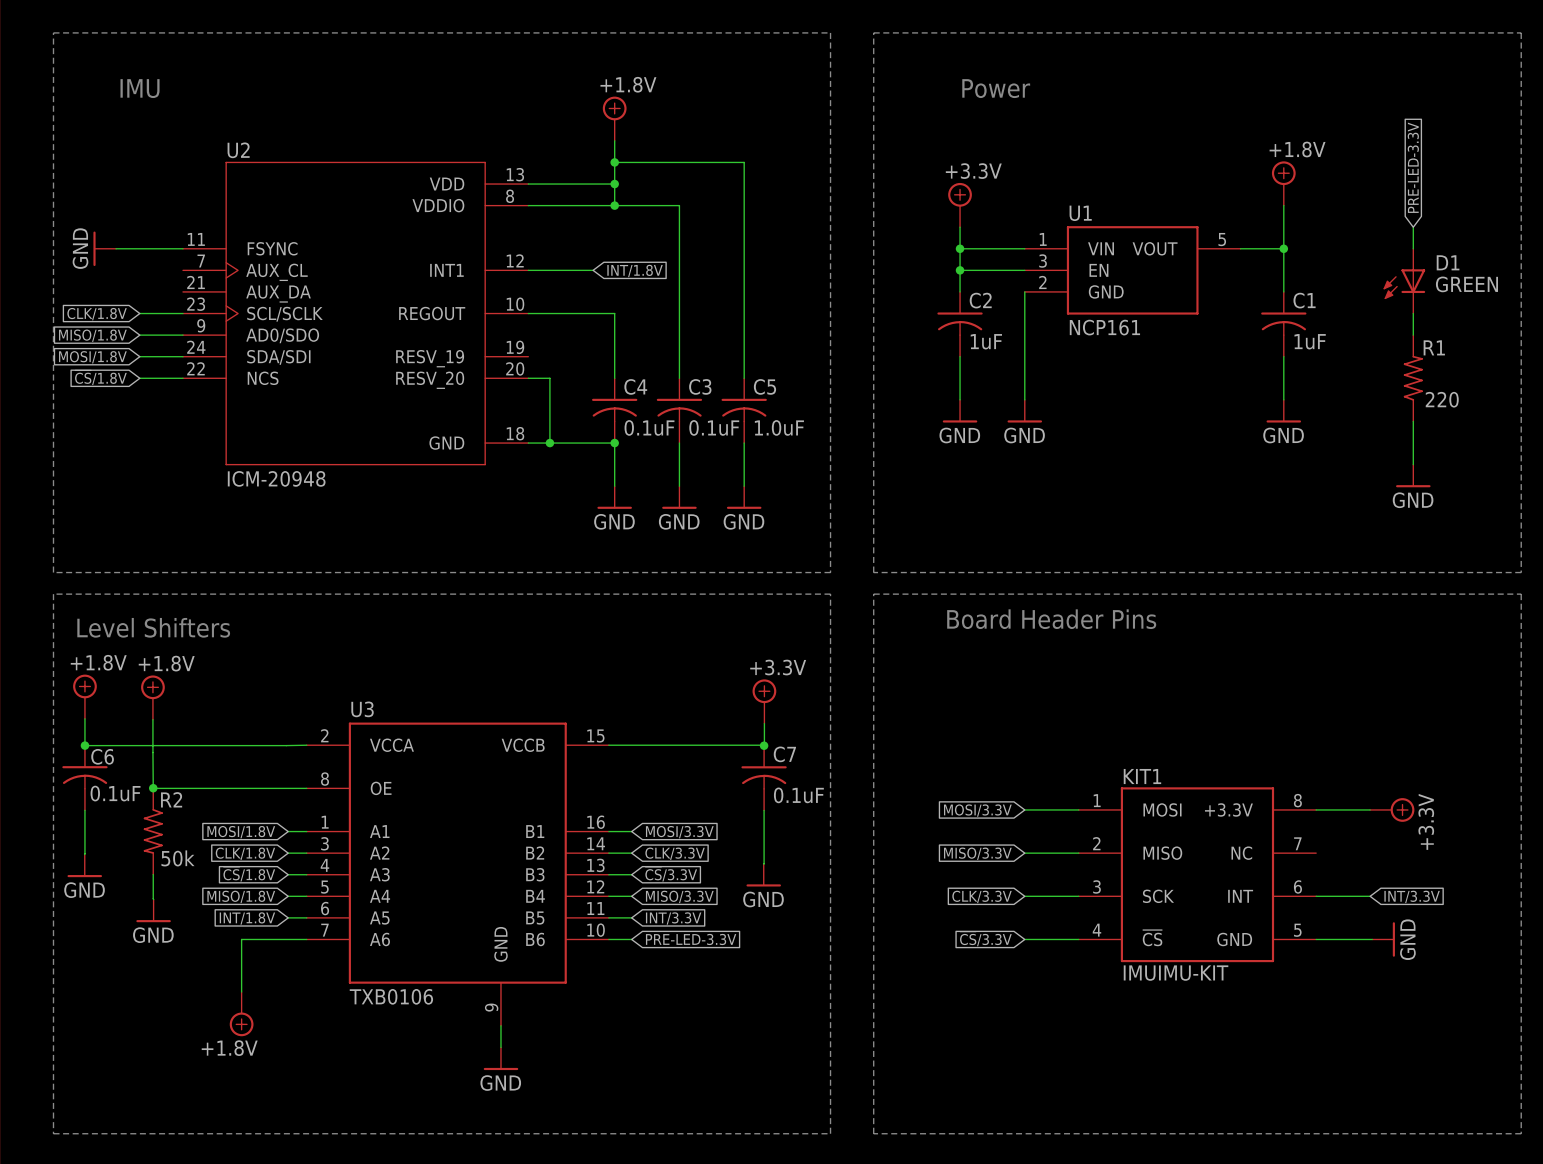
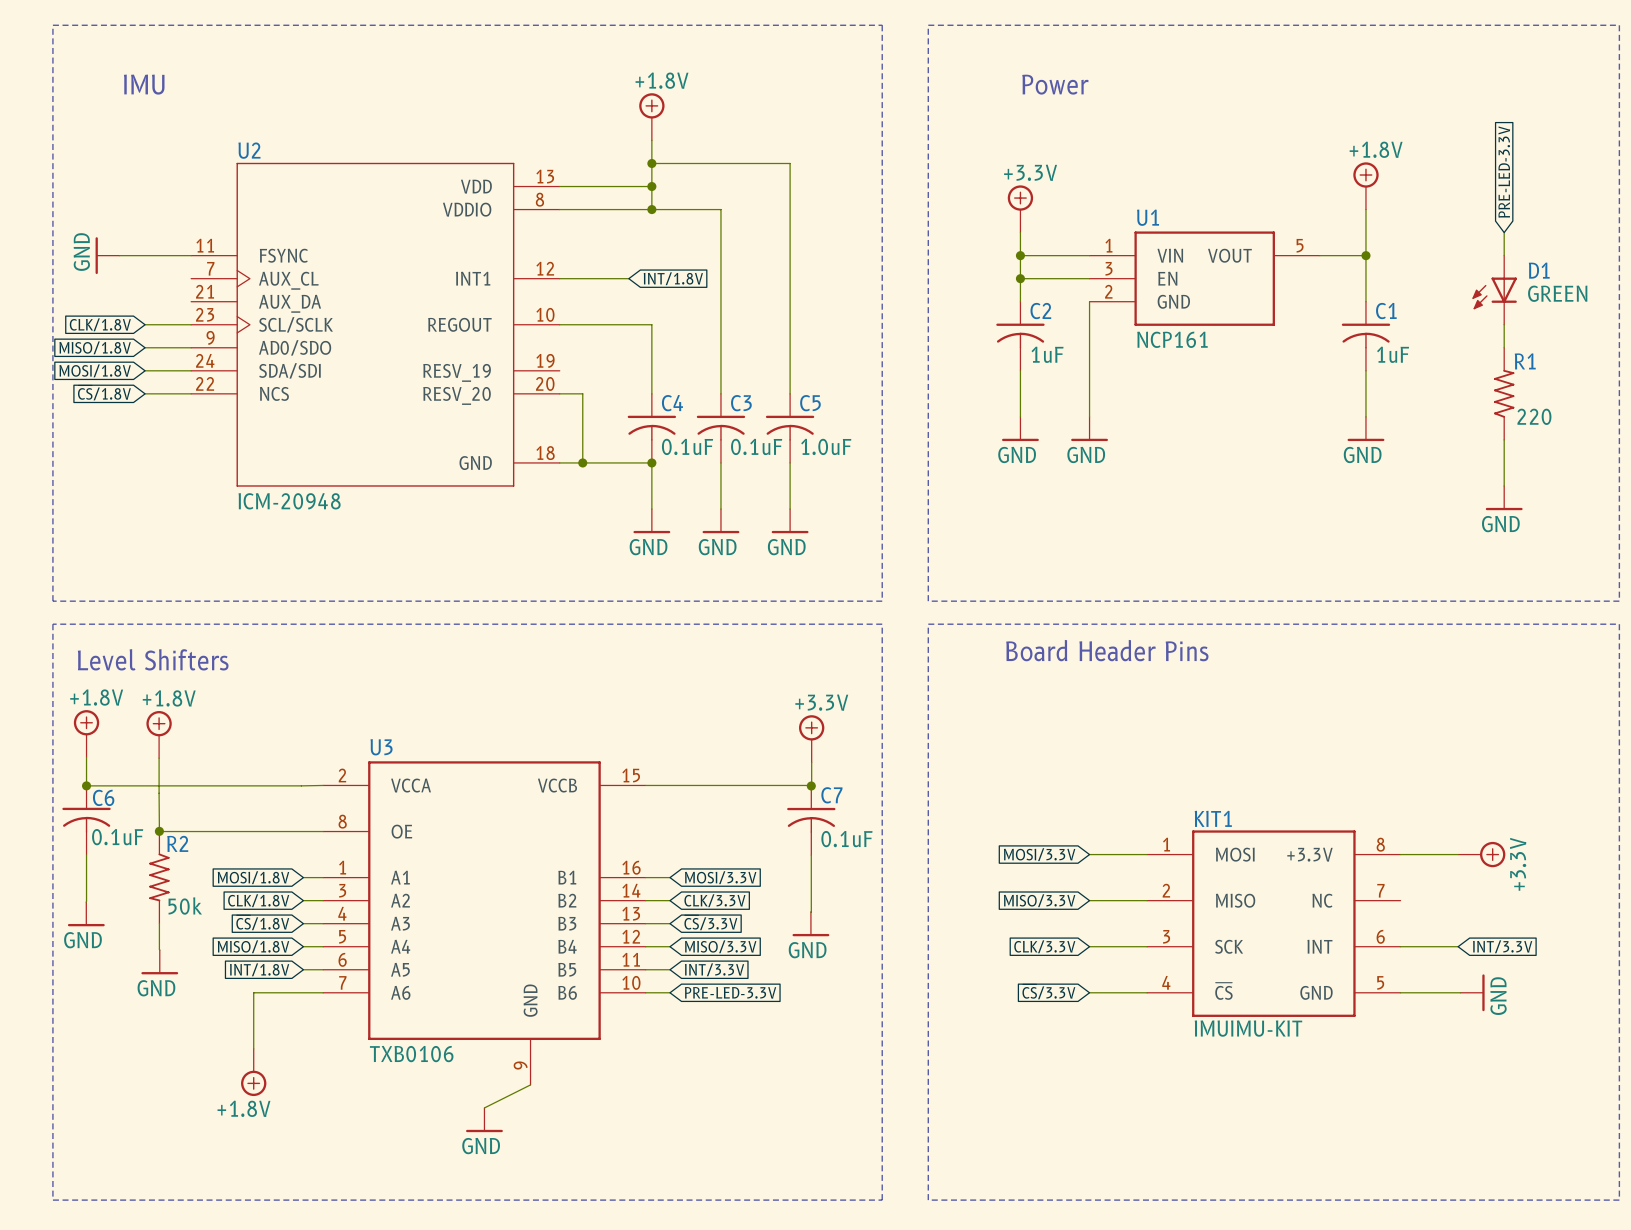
wire: (500, 1025) (500, 1047) -> (530, 1084) (484, 1107)
power symbol position: GND (500, 1058) -> GND (484, 1120)

